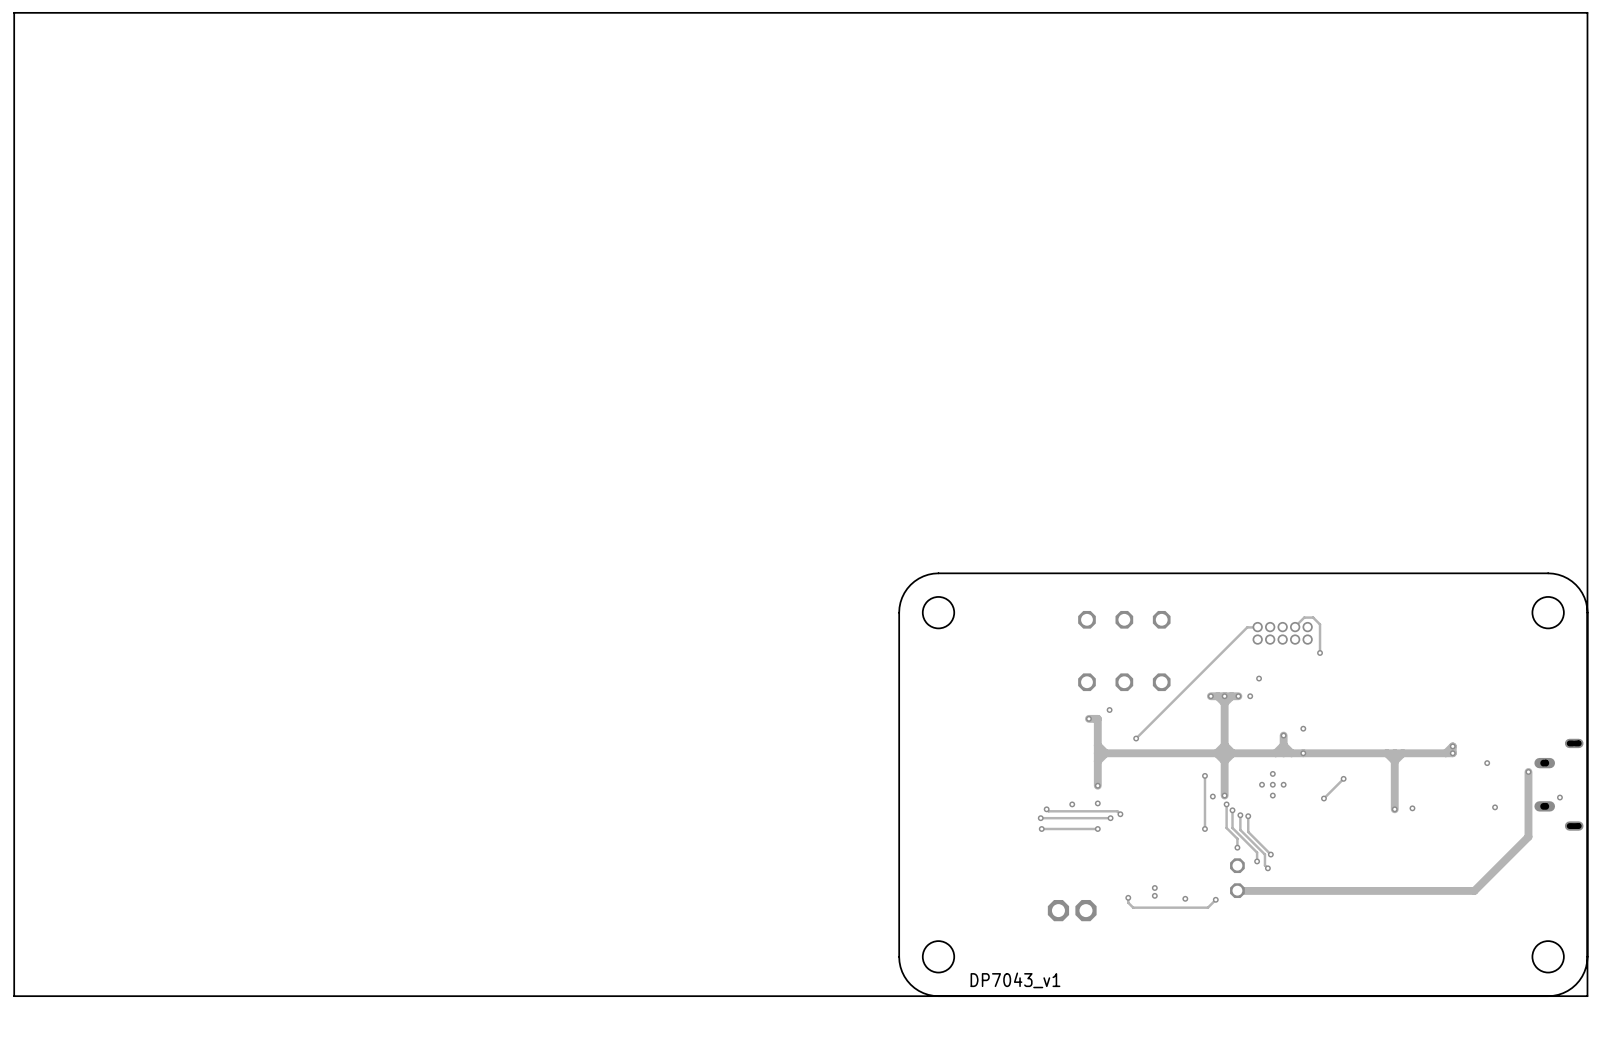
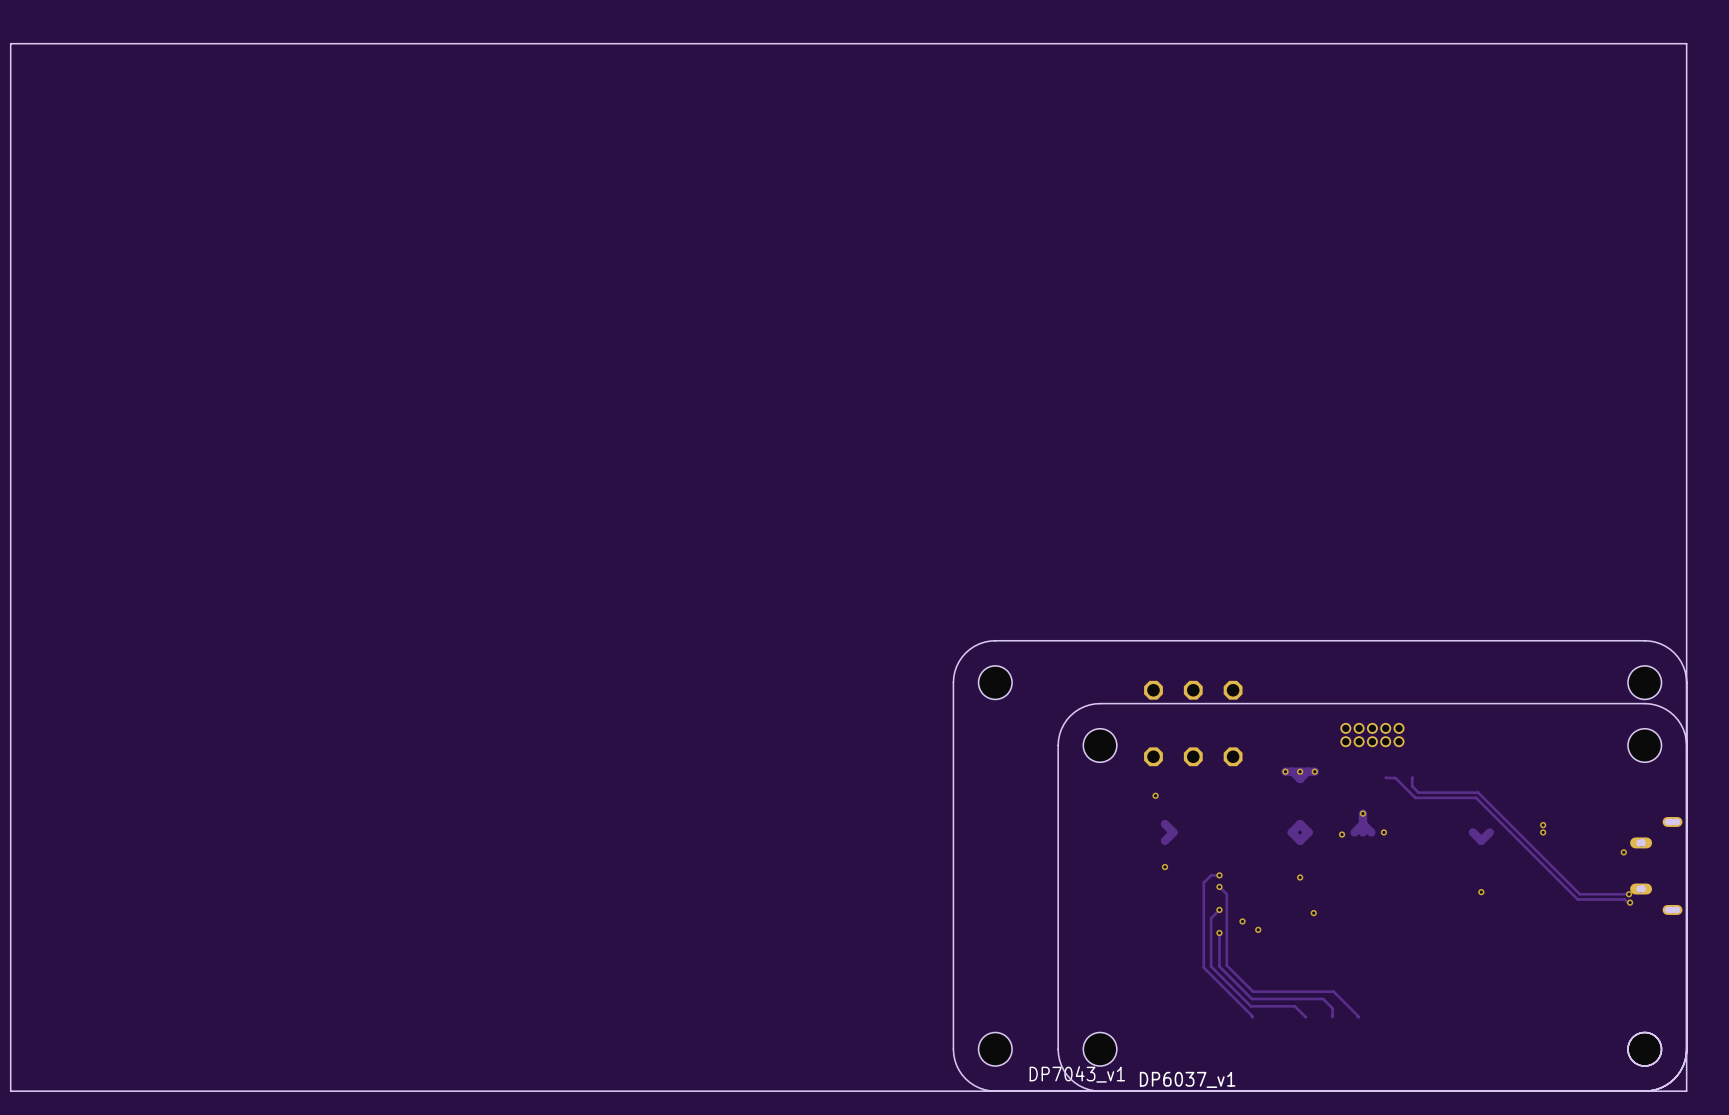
track: (1257, 627) (1247, 627) (1136, 738) -> none
track: (1295, 627) (1304, 617) (1313, 617) (1320, 624) (1320, 652) -> none
part position: (1282, 633) -> (1372, 735)
via: (1320, 652) -> none
via: (1259, 678) -> none
track: (1224, 696) (1224, 795) -> none
via: (1250, 696) -> none
track: none -> (1385, 777) (1395, 777) (1415, 797) (1476, 797) (1577, 899) (1624, 899) (1630, 902)
track: none -> (1412, 777) (1412, 786) (1418, 792) (1478, 792) (1579, 894) (1629, 894)
via: (1109, 710) -> none
track: (1088, 718) (1097, 718) (1097, 785) -> none
via: (1303, 728) -> none
via: (1136, 738) -> none
track: (1394, 753) (1394, 809) -> none
track: (1445, 753) (1452, 746) (1452, 753) (1097, 753) -> none
via: none -> (1342, 834)
via: (1487, 763) -> none
track: (1528, 771) (1528, 836) (1474, 890) (1237, 890) -> none
via: (1272, 773) -> none
track: (1204, 775) (1204, 828) -> none
via: (1204, 775) -> none
track: (1343, 778) (1323, 798) -> none
via: (1343, 778) -> none
via: (1262, 784) -> none
via: (1272, 784) -> none
via: (1283, 784) -> none
track: none -> (1219, 875) (1211, 875) (1203, 882) (1203, 967) (1252, 1017)
via: none -> (1219, 875)
via: (1272, 795) -> none
via: (1212, 796) -> none
via: (1559, 797) -> none
via: (1323, 798) -> none
via: (1097, 803) -> none
via: (1072, 804) -> none
track: none -> (1219, 886) (1226, 894) (1226, 965) (1253, 991) (1333, 991) (1359, 1017)
via: none -> (1219, 886)
track: (1226, 804) (1226, 828) (1237, 838) (1237, 847) -> none
via: (1226, 804) -> none
via: (1495, 807) -> none
via: (1412, 808) -> none
track: (1046, 809) (1048, 811) (1117, 811) (1120, 814) -> none
via: (1046, 809) -> none
track: (1232, 810) (1232, 828) (1257, 852) (1257, 861) -> none
via: (1232, 810) -> none
via: none -> (1629, 894)
via: (1120, 814) -> none
part: none -> (1372, 897)
track: (1240, 815) (1240, 829) (1264, 854) (1264, 865) (1267, 868) -> none
via: (1240, 815) -> none
track: (1248, 816) (1248, 831) (1270, 854) -> none
via: (1248, 816) -> none
via: (1040, 818) -> none
track: (1110, 818) (1040, 818) -> none
via: (1110, 818) -> none
via: none -> (1630, 902)
track: none -> (1219, 909) (1211, 918) (1211, 966) (1250, 1006) (1294, 1006) (1305, 1017)
via: none -> (1219, 909)
via: (1041, 828) -> none
track: (1097, 828) (1041, 828) -> none
via: (1097, 828) -> none
via: (1204, 828) -> none
via: none -> (1313, 913)
via: none -> (1242, 921)
via: none -> (1258, 929)
track: none -> (1219, 933) (1219, 966) (1251, 998) (1323, 998) (1332, 1008) (1332, 1015)
via: none -> (1219, 933)
via: (1237, 847) -> none
via: (1270, 854) -> none
via: (1257, 861) -> none
via: (1267, 868) -> none
part: (1237, 878) -> none
via: (1154, 887) -> none
via: (1154, 895) -> none
track: (1128, 897) (1128, 902) (1133, 907) (1207, 907) (1215, 899) -> none
via: (1128, 897) -> none
via: (1185, 898) -> none
via: (1215, 899) -> none
part: (1058, 910) -> none
part: (1085, 910) -> none
track: none -> (1332, 1015) (1332, 1017)

